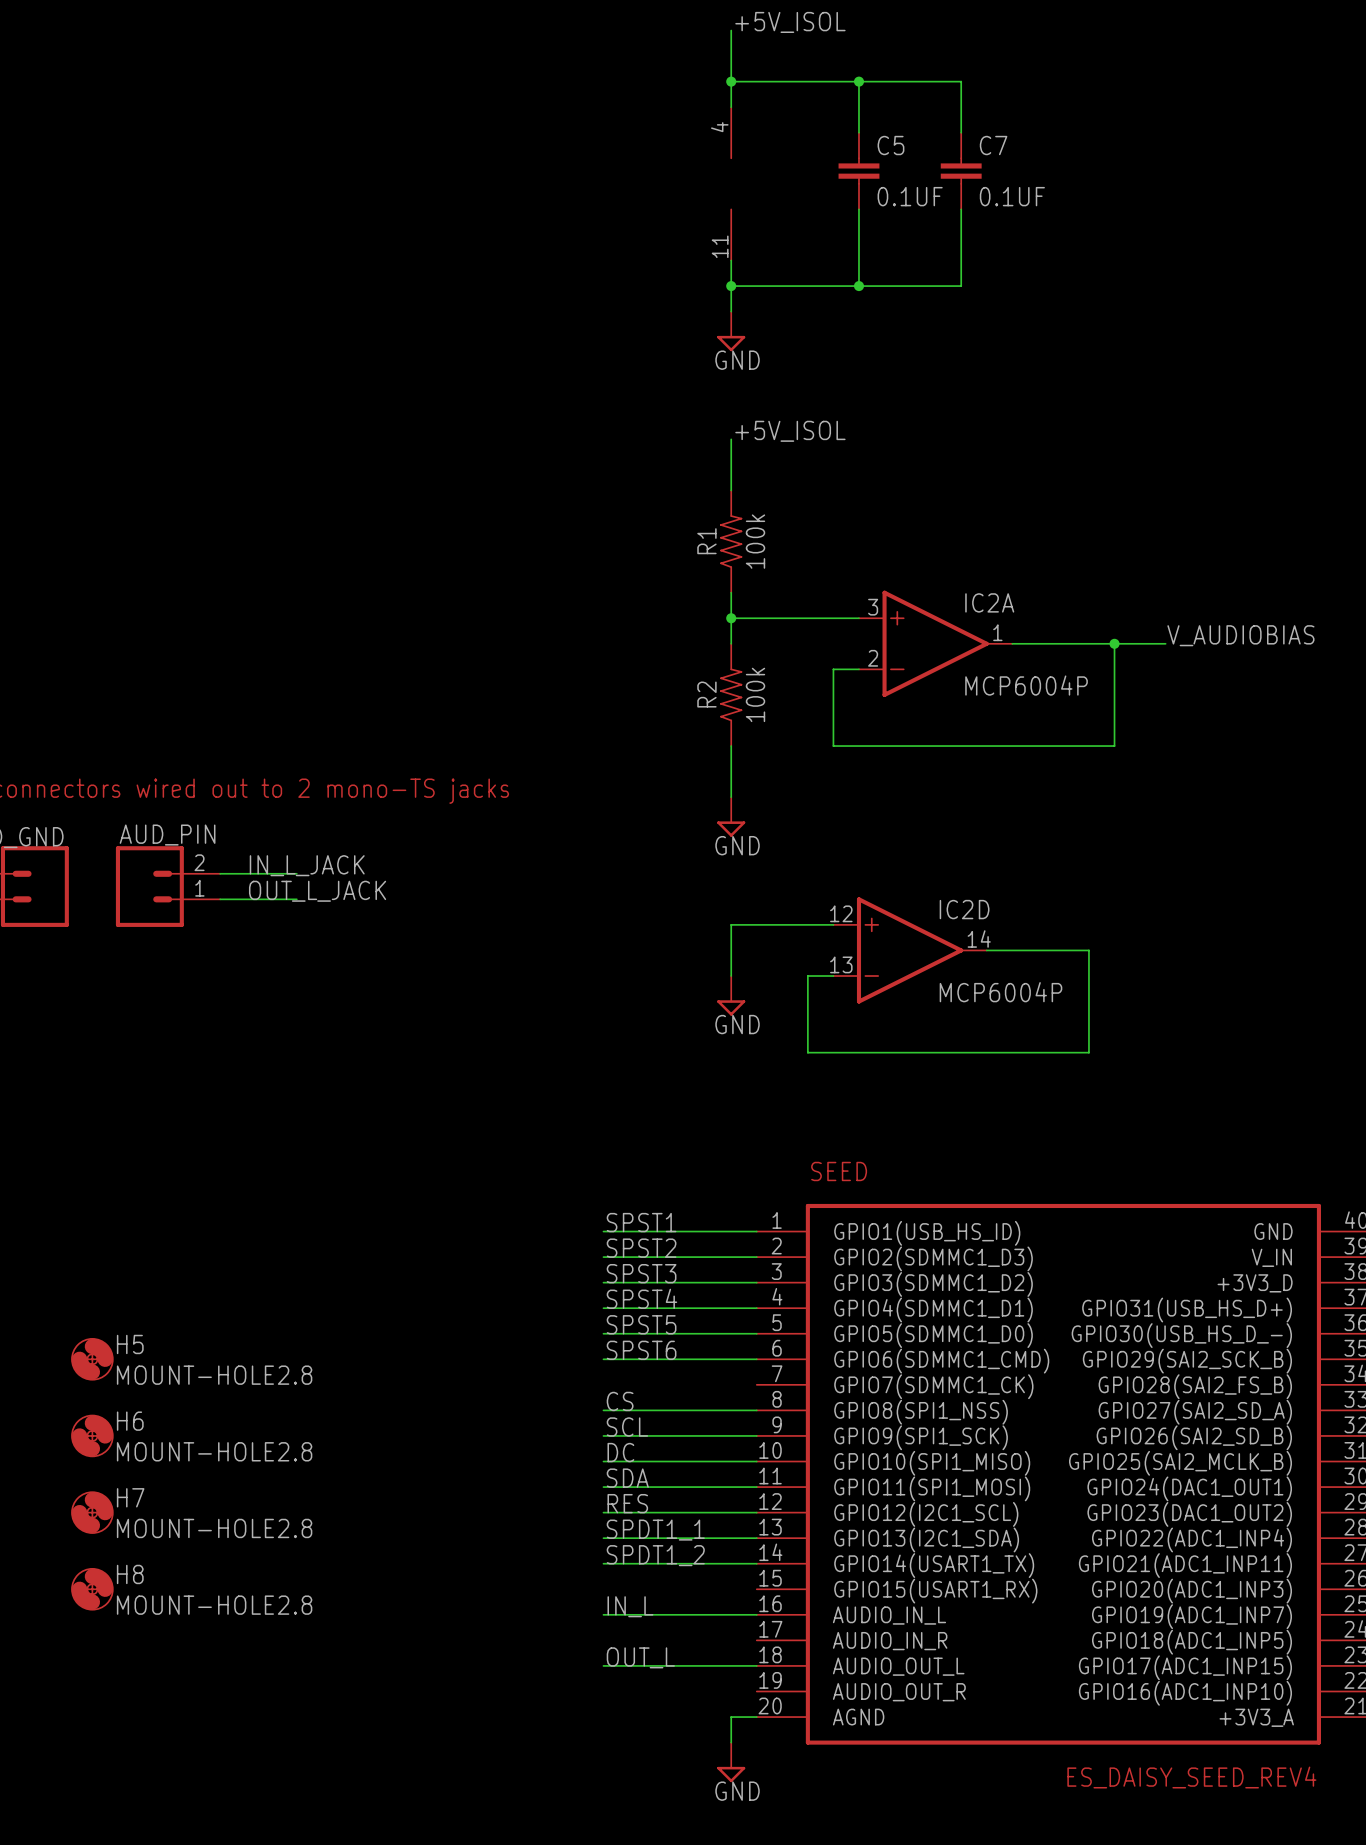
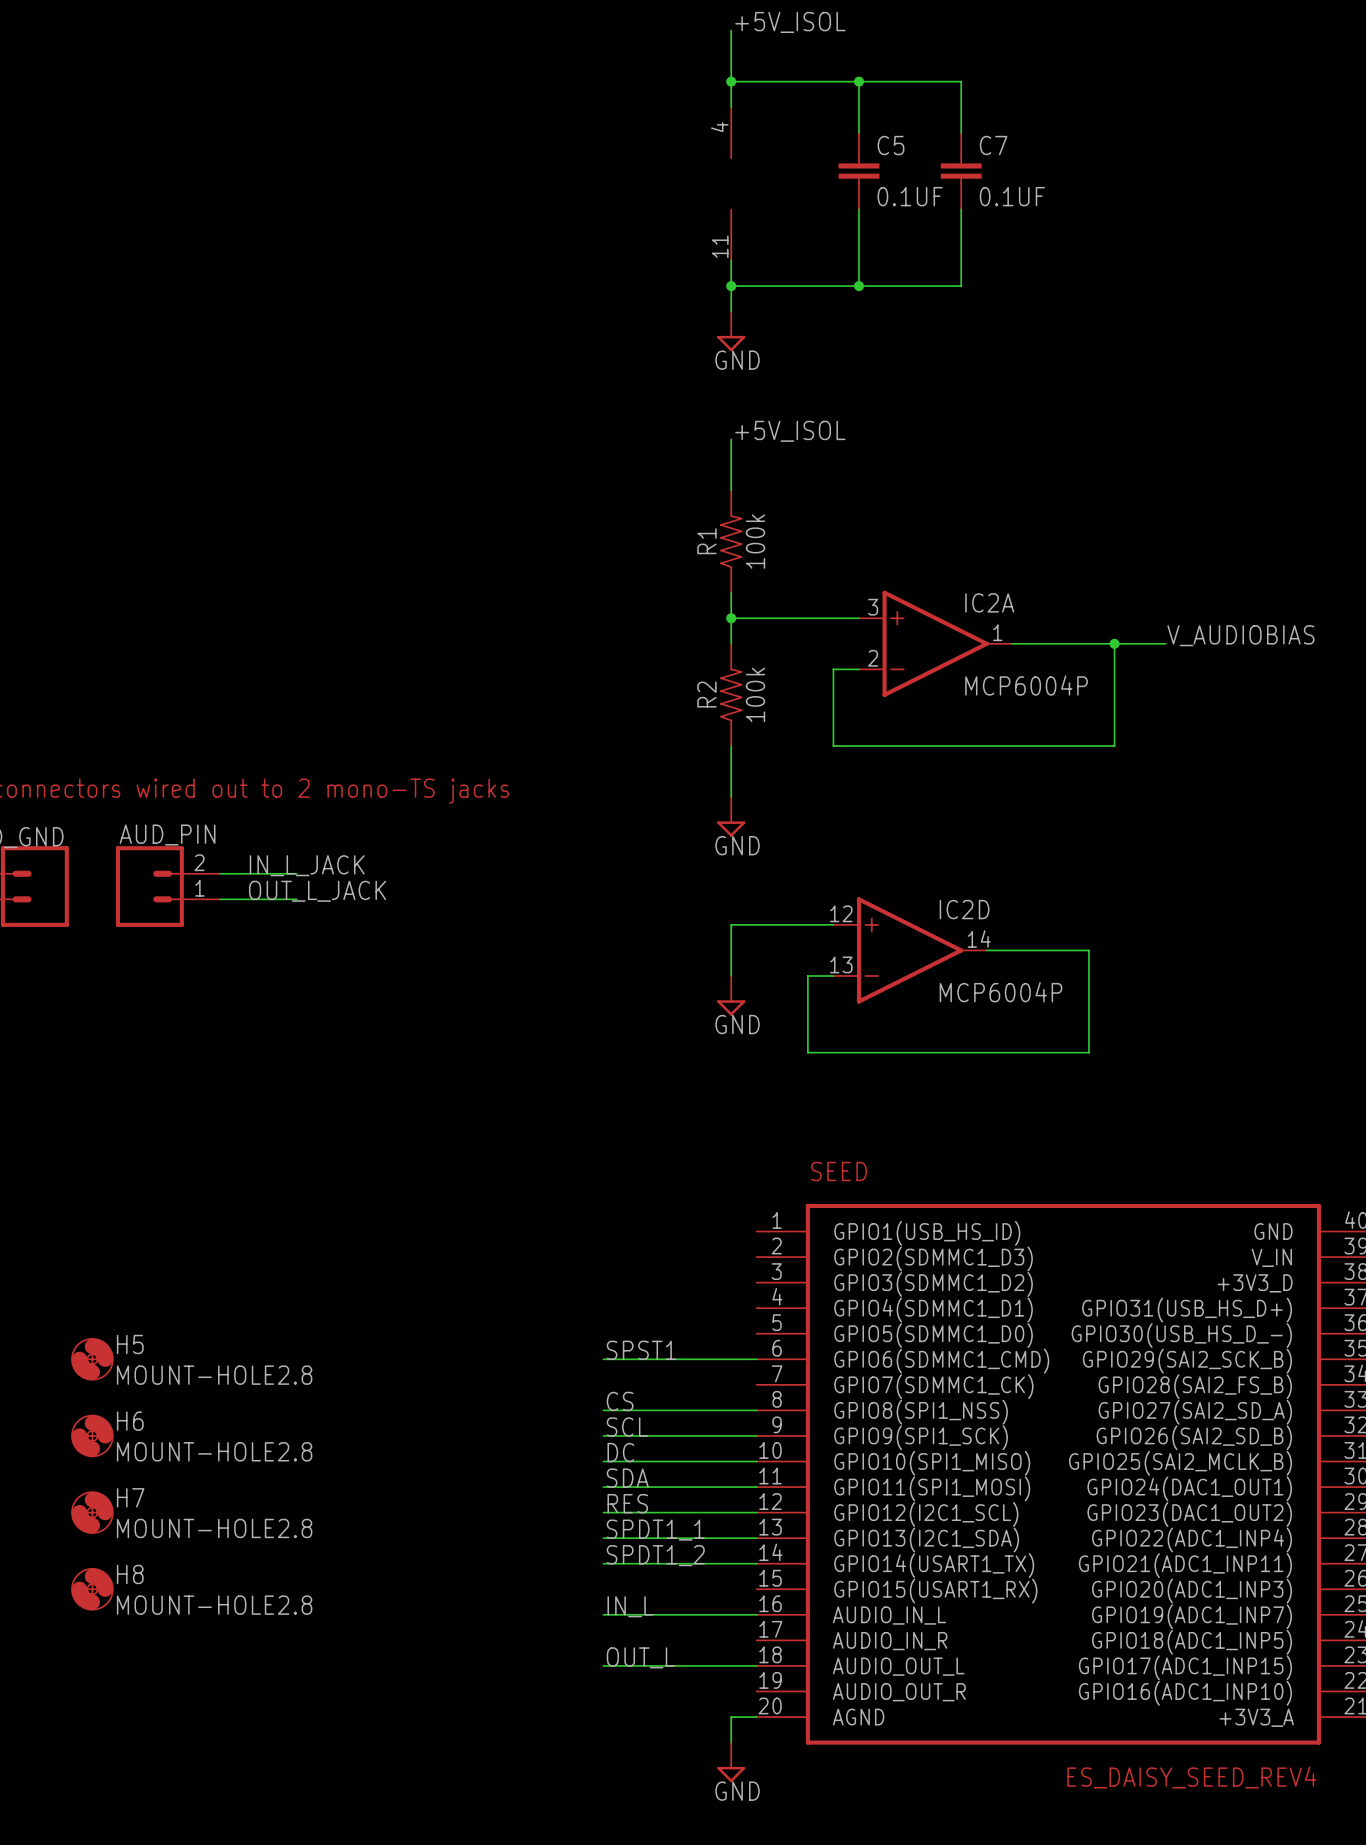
label: SPST1 (641, 1222) -> none
wire: (603, 1231) (756, 1231) -> none
label: SPST2 (641, 1248) -> none
wire: (603, 1257) (756, 1257) -> none
label: SPST3 (641, 1273) -> none
wire: (603, 1282) (756, 1282) -> none
label: SPST4 (641, 1298) -> none
wire: (603, 1308) (756, 1308) -> none
label: SPST5 (641, 1324) -> none
wire: (603, 1333) (756, 1333) -> none
label: SPST6 (641, 1350) -> SPST1 (641, 1350)

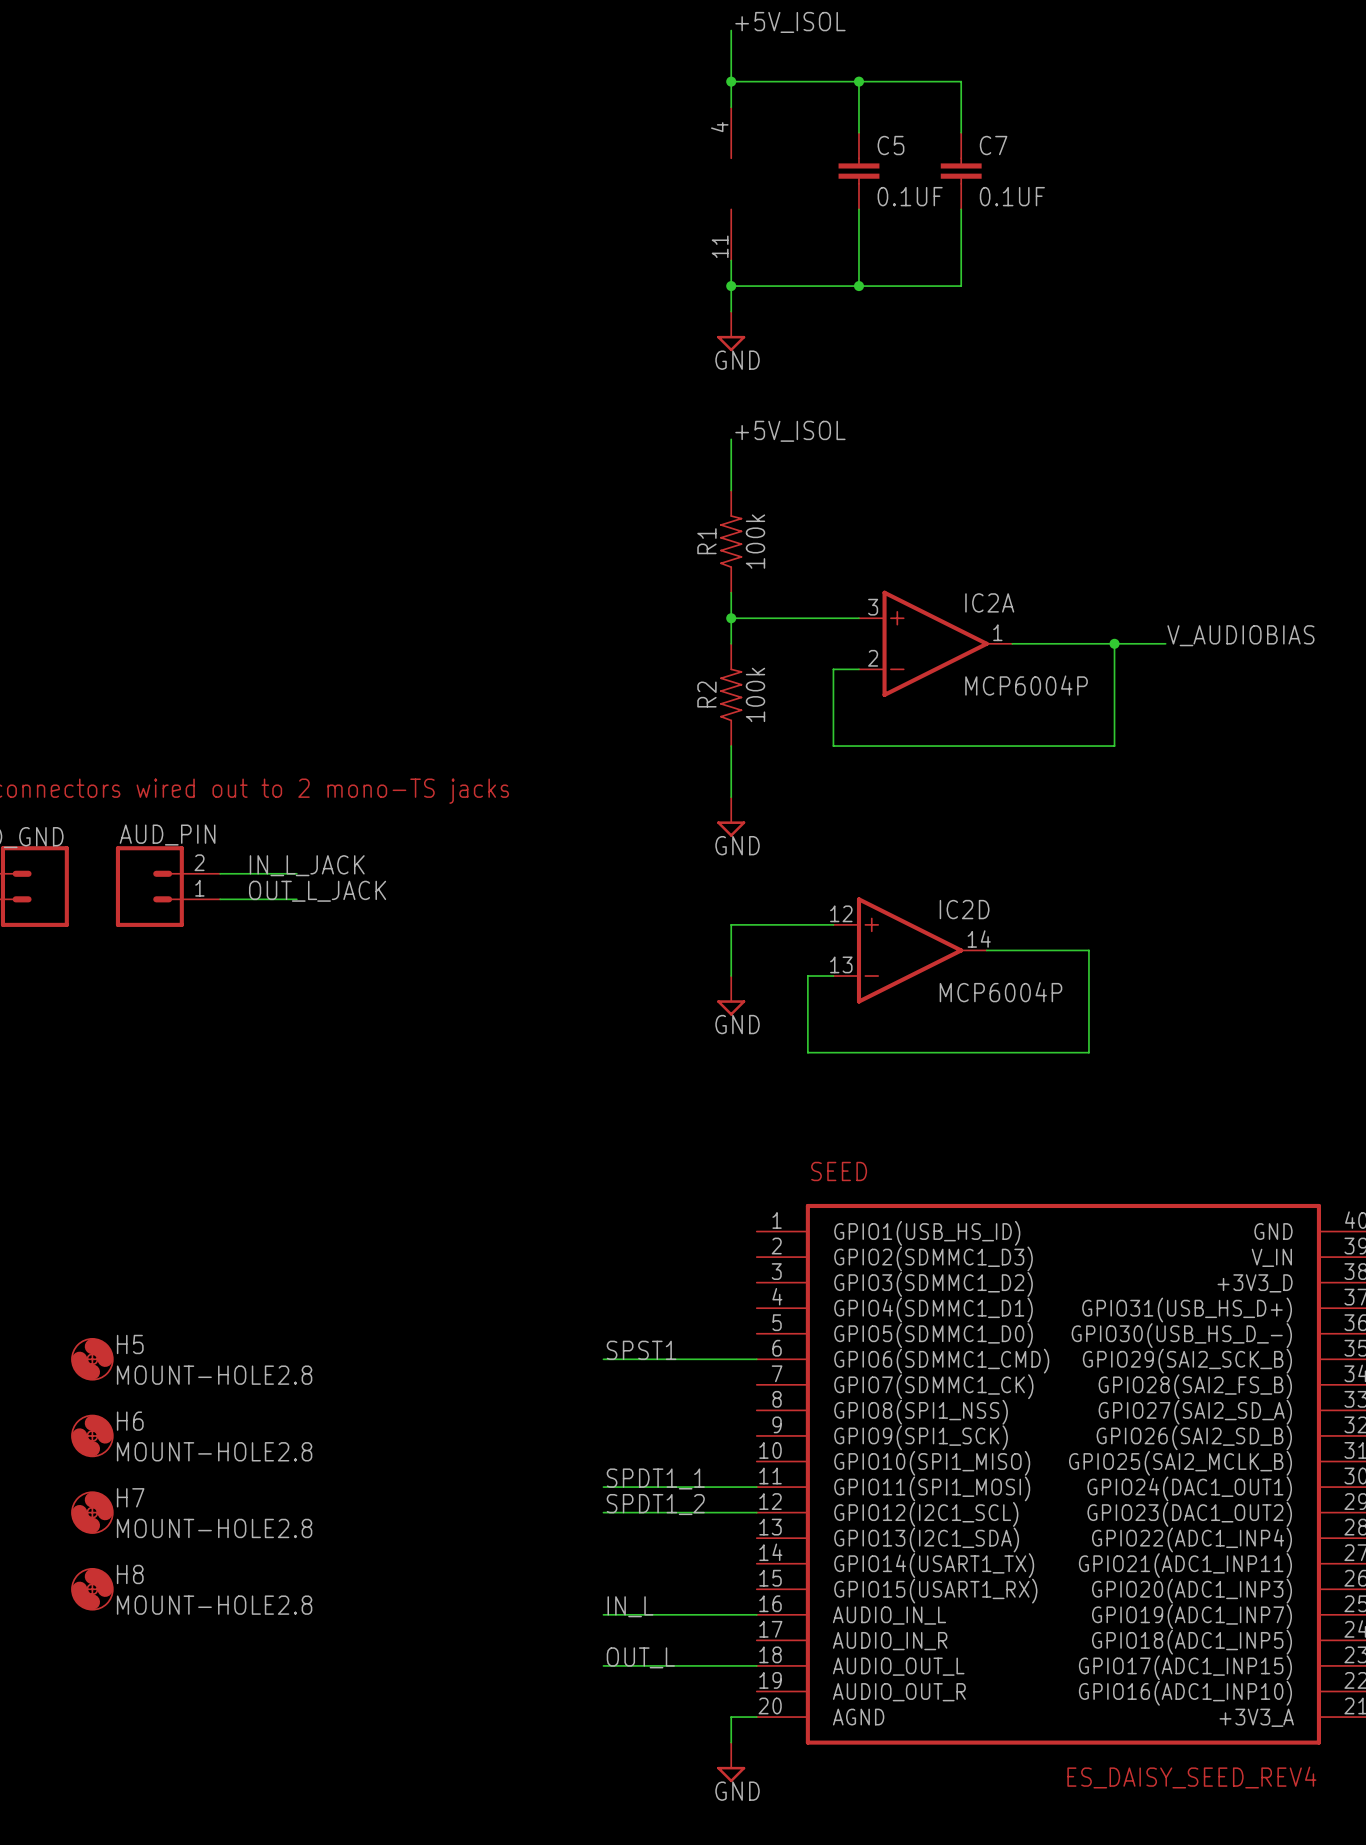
label: CS (620, 1401) -> none
wire: (603, 1410) (756, 1410) -> none
label: SCL (627, 1427) -> none
wire: (603, 1435) (756, 1435) -> none
label: DC (620, 1452) -> none
wire: (603, 1461) (756, 1461) -> none
label: SDA (627, 1478) -> SPDT1_1 (655, 1478)
label: RES (627, 1503) -> SPDT1_2 (655, 1504)
label: SPDT1_1 (655, 1530) -> none
wire: (603, 1538) (756, 1538) -> none
label: SPDT1_2 (655, 1555) -> none
wire: (603, 1563) (756, 1563) -> none

